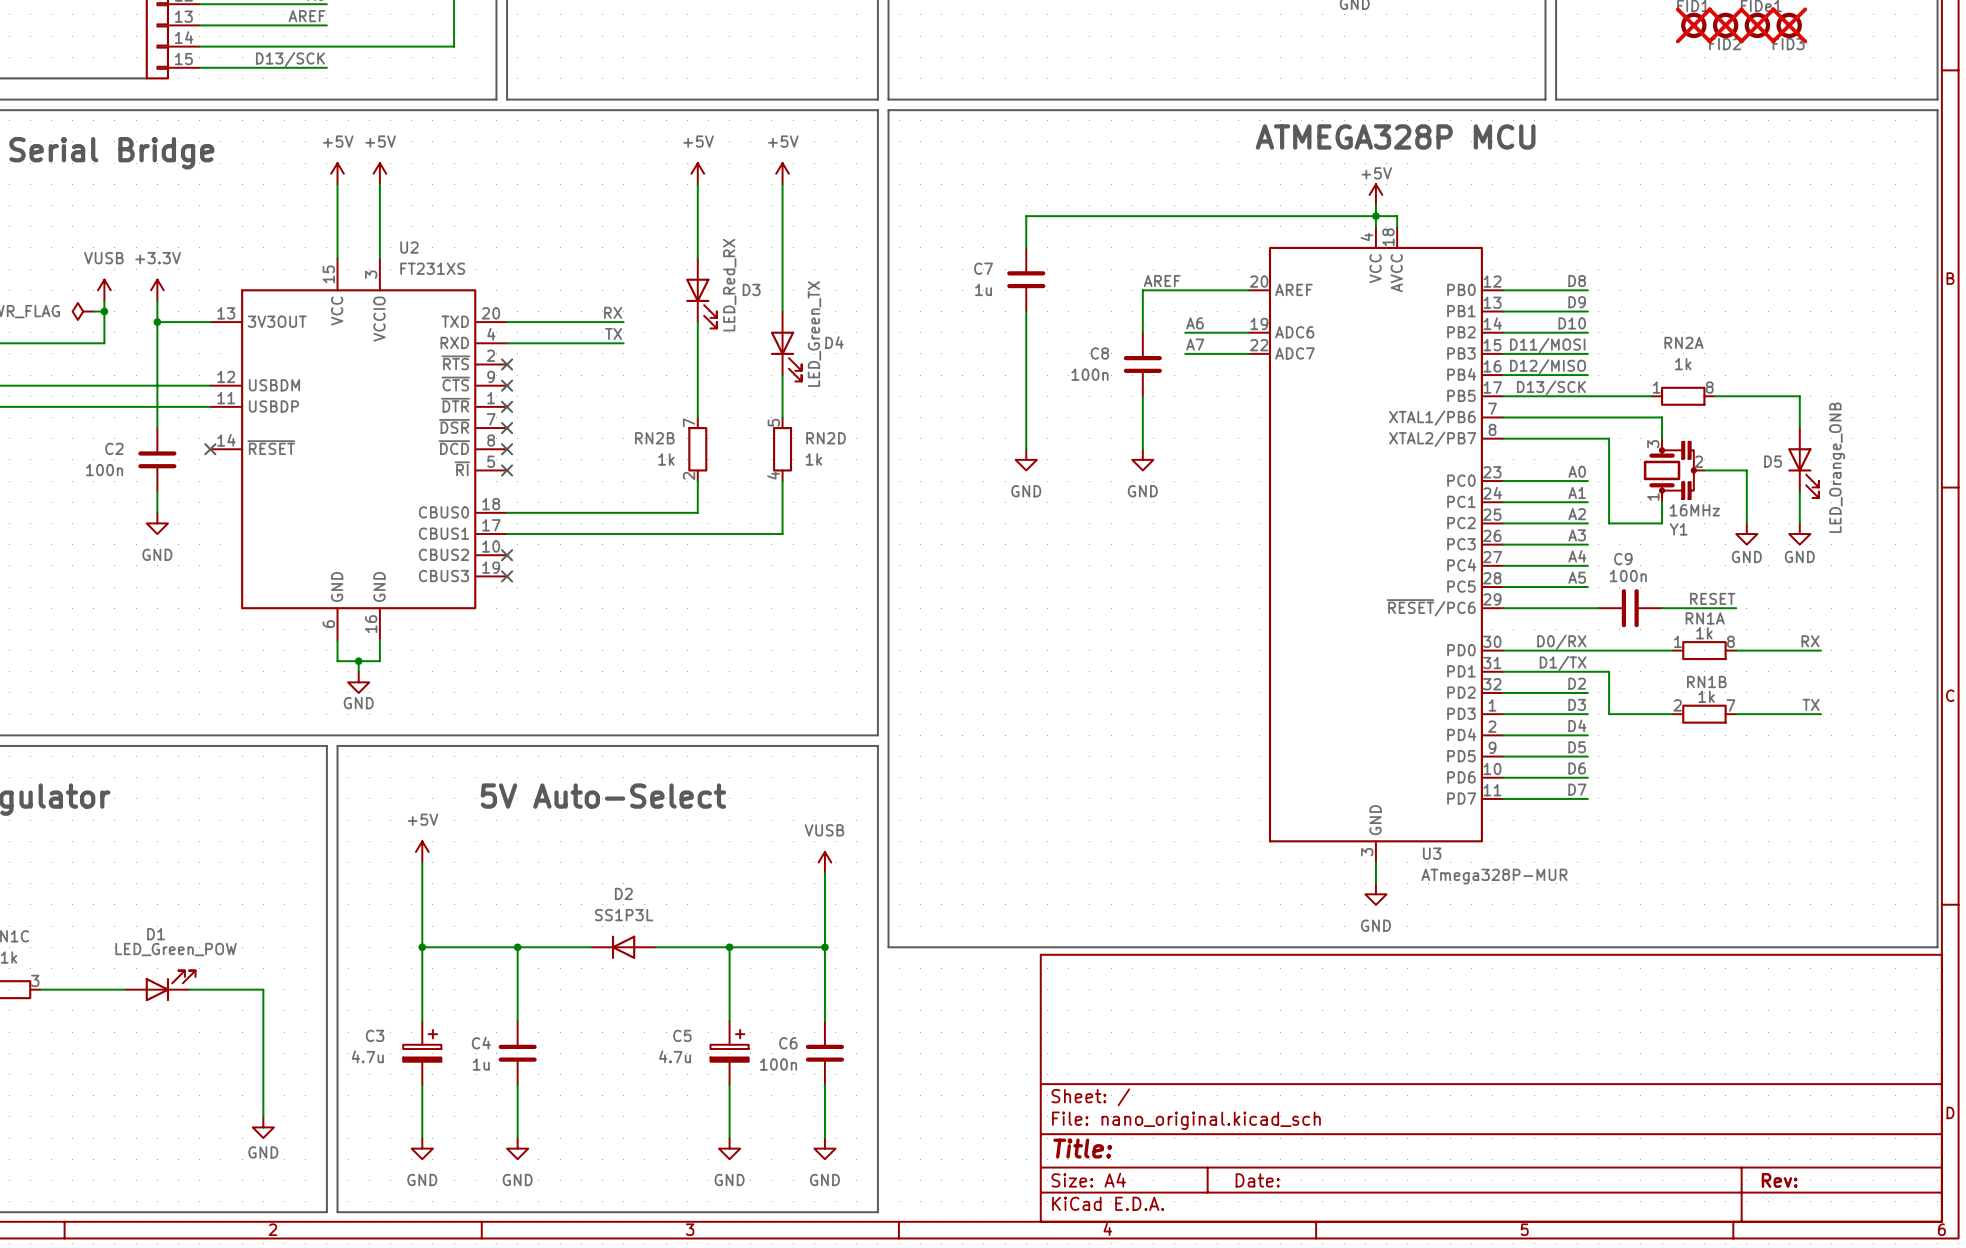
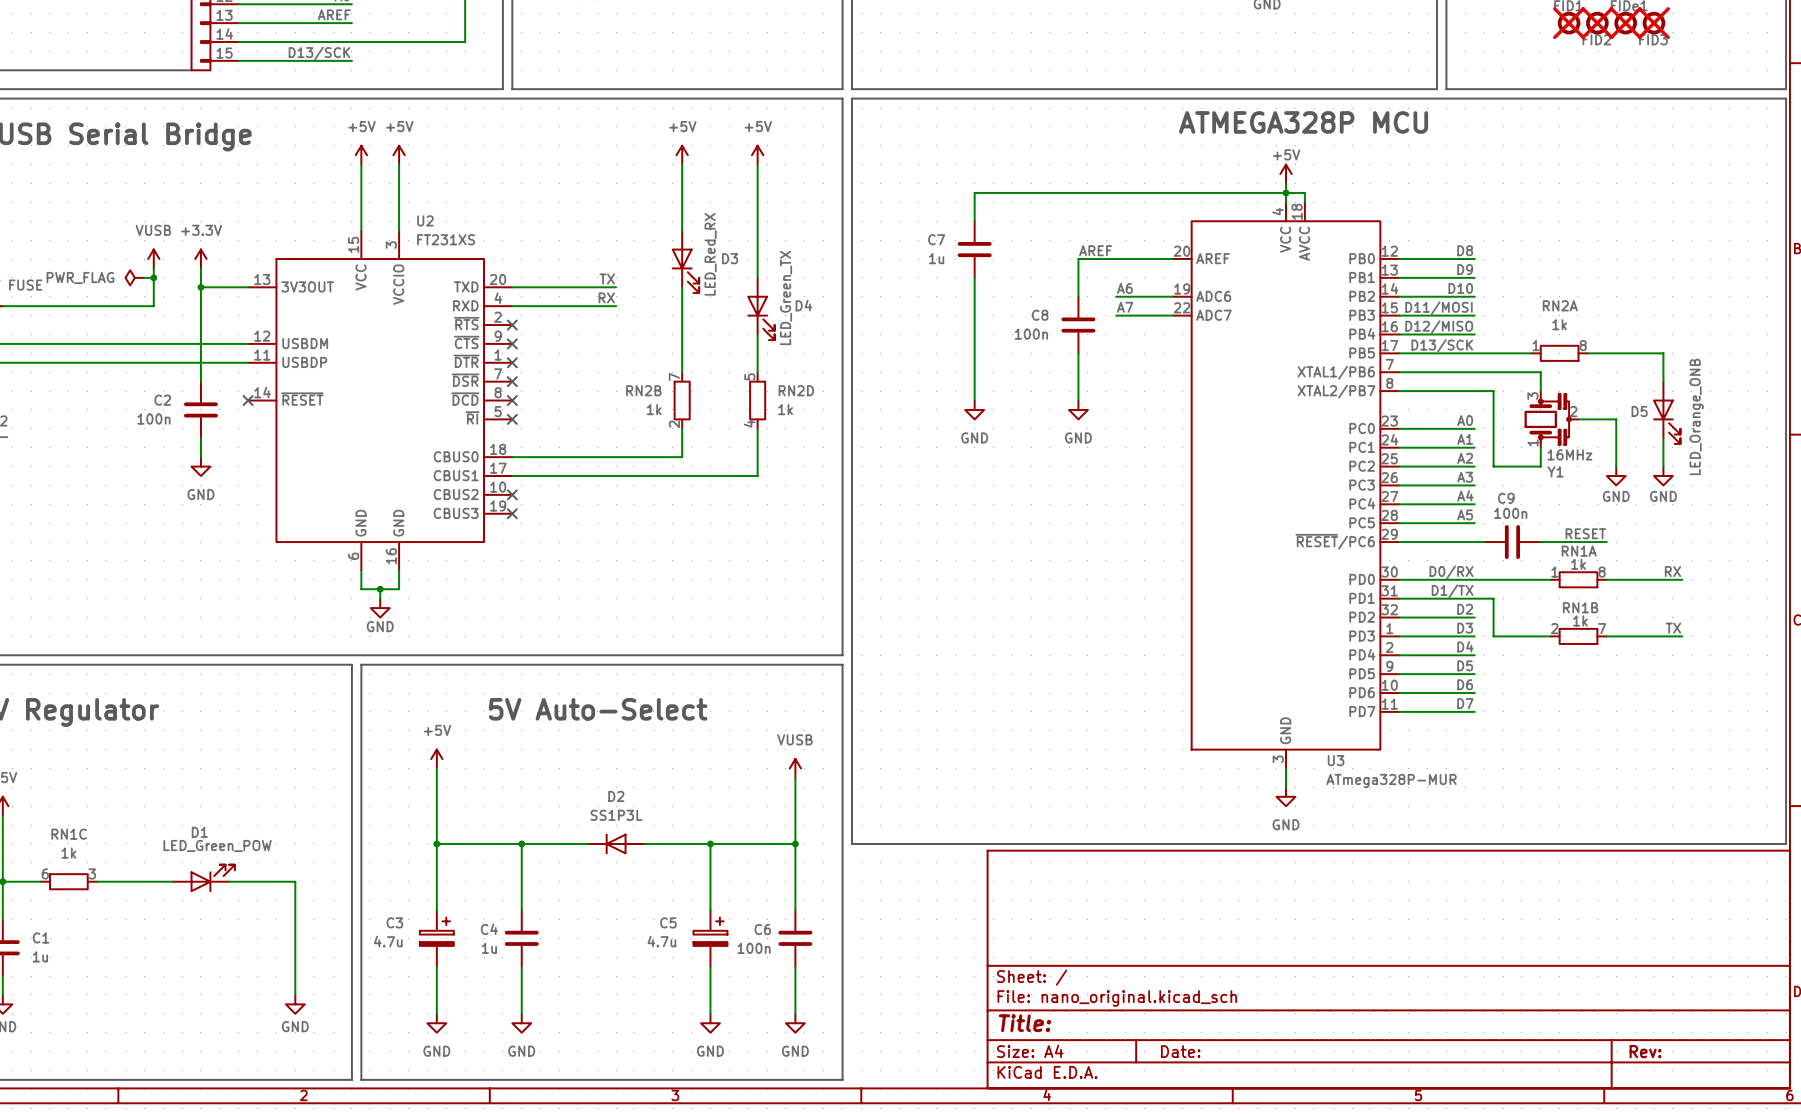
label: RX (613, 312) -> TX (607, 279)
label: TX (613, 334) -> RX (606, 297)

